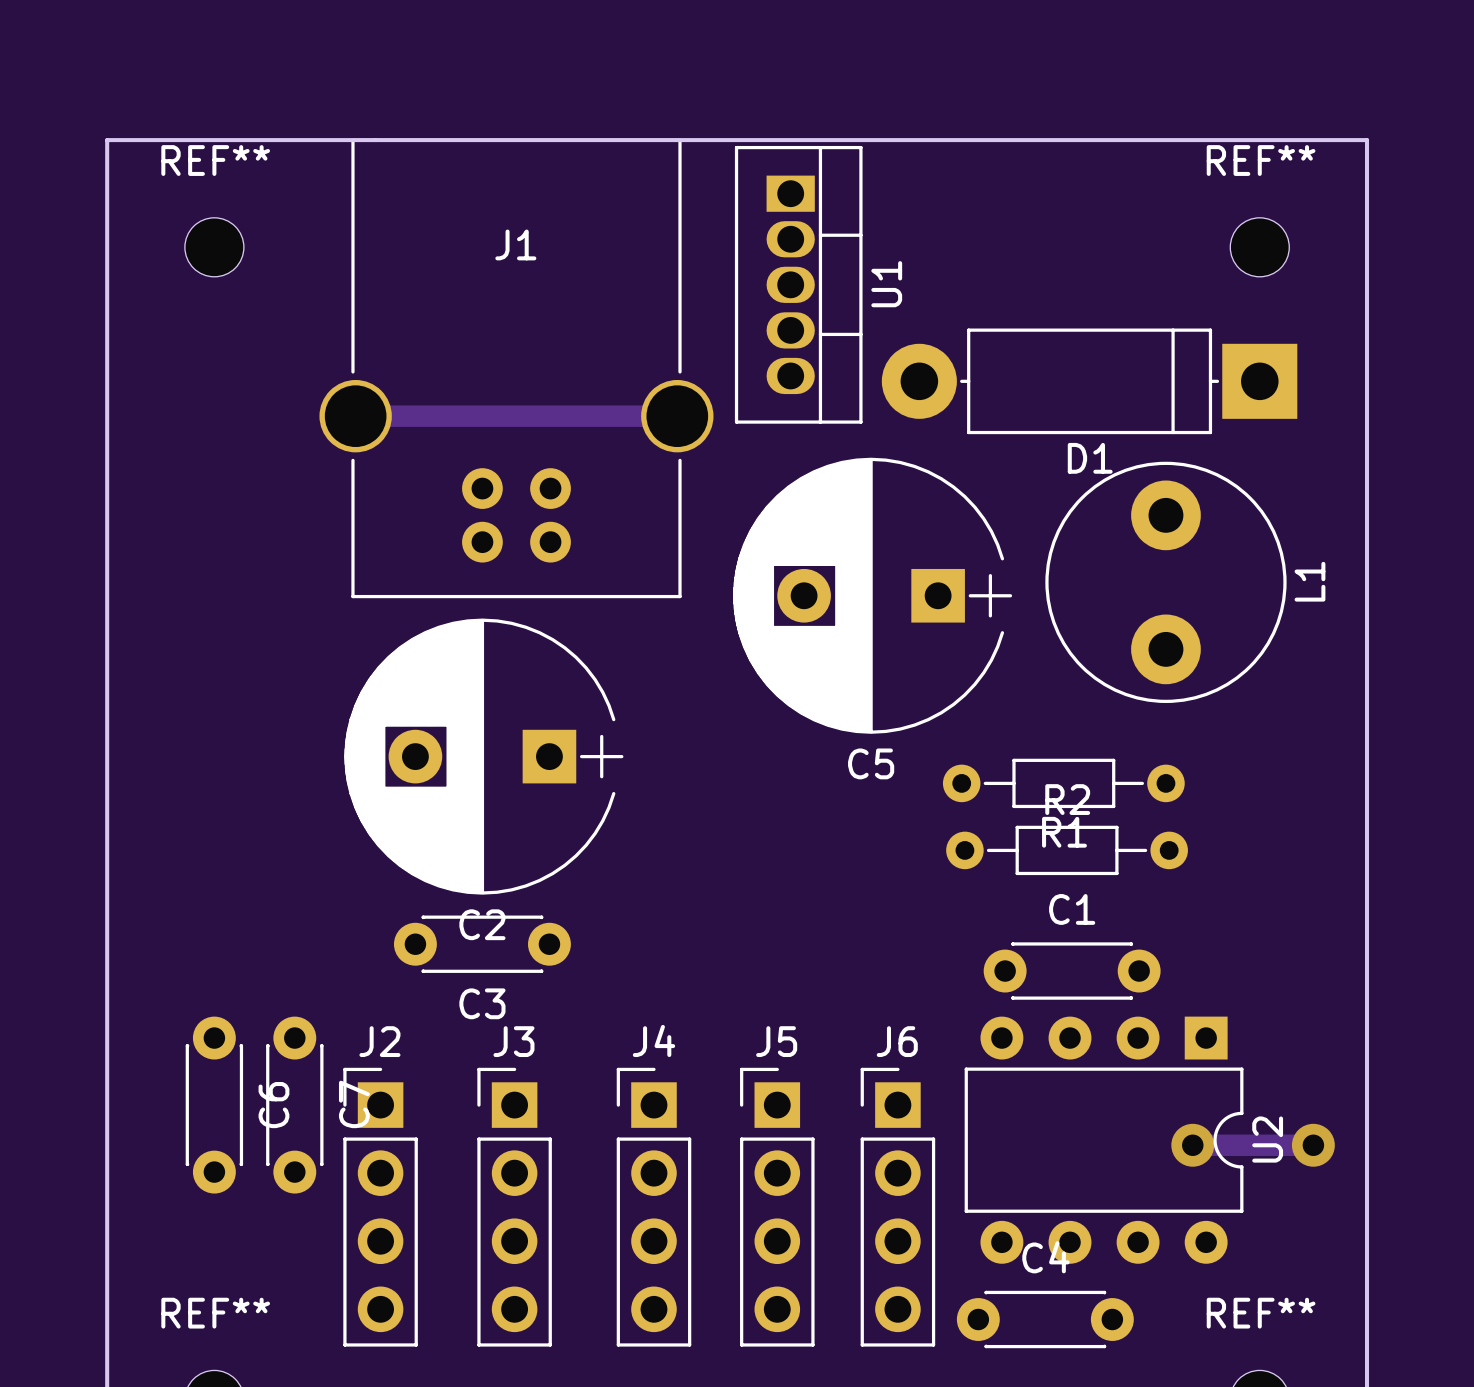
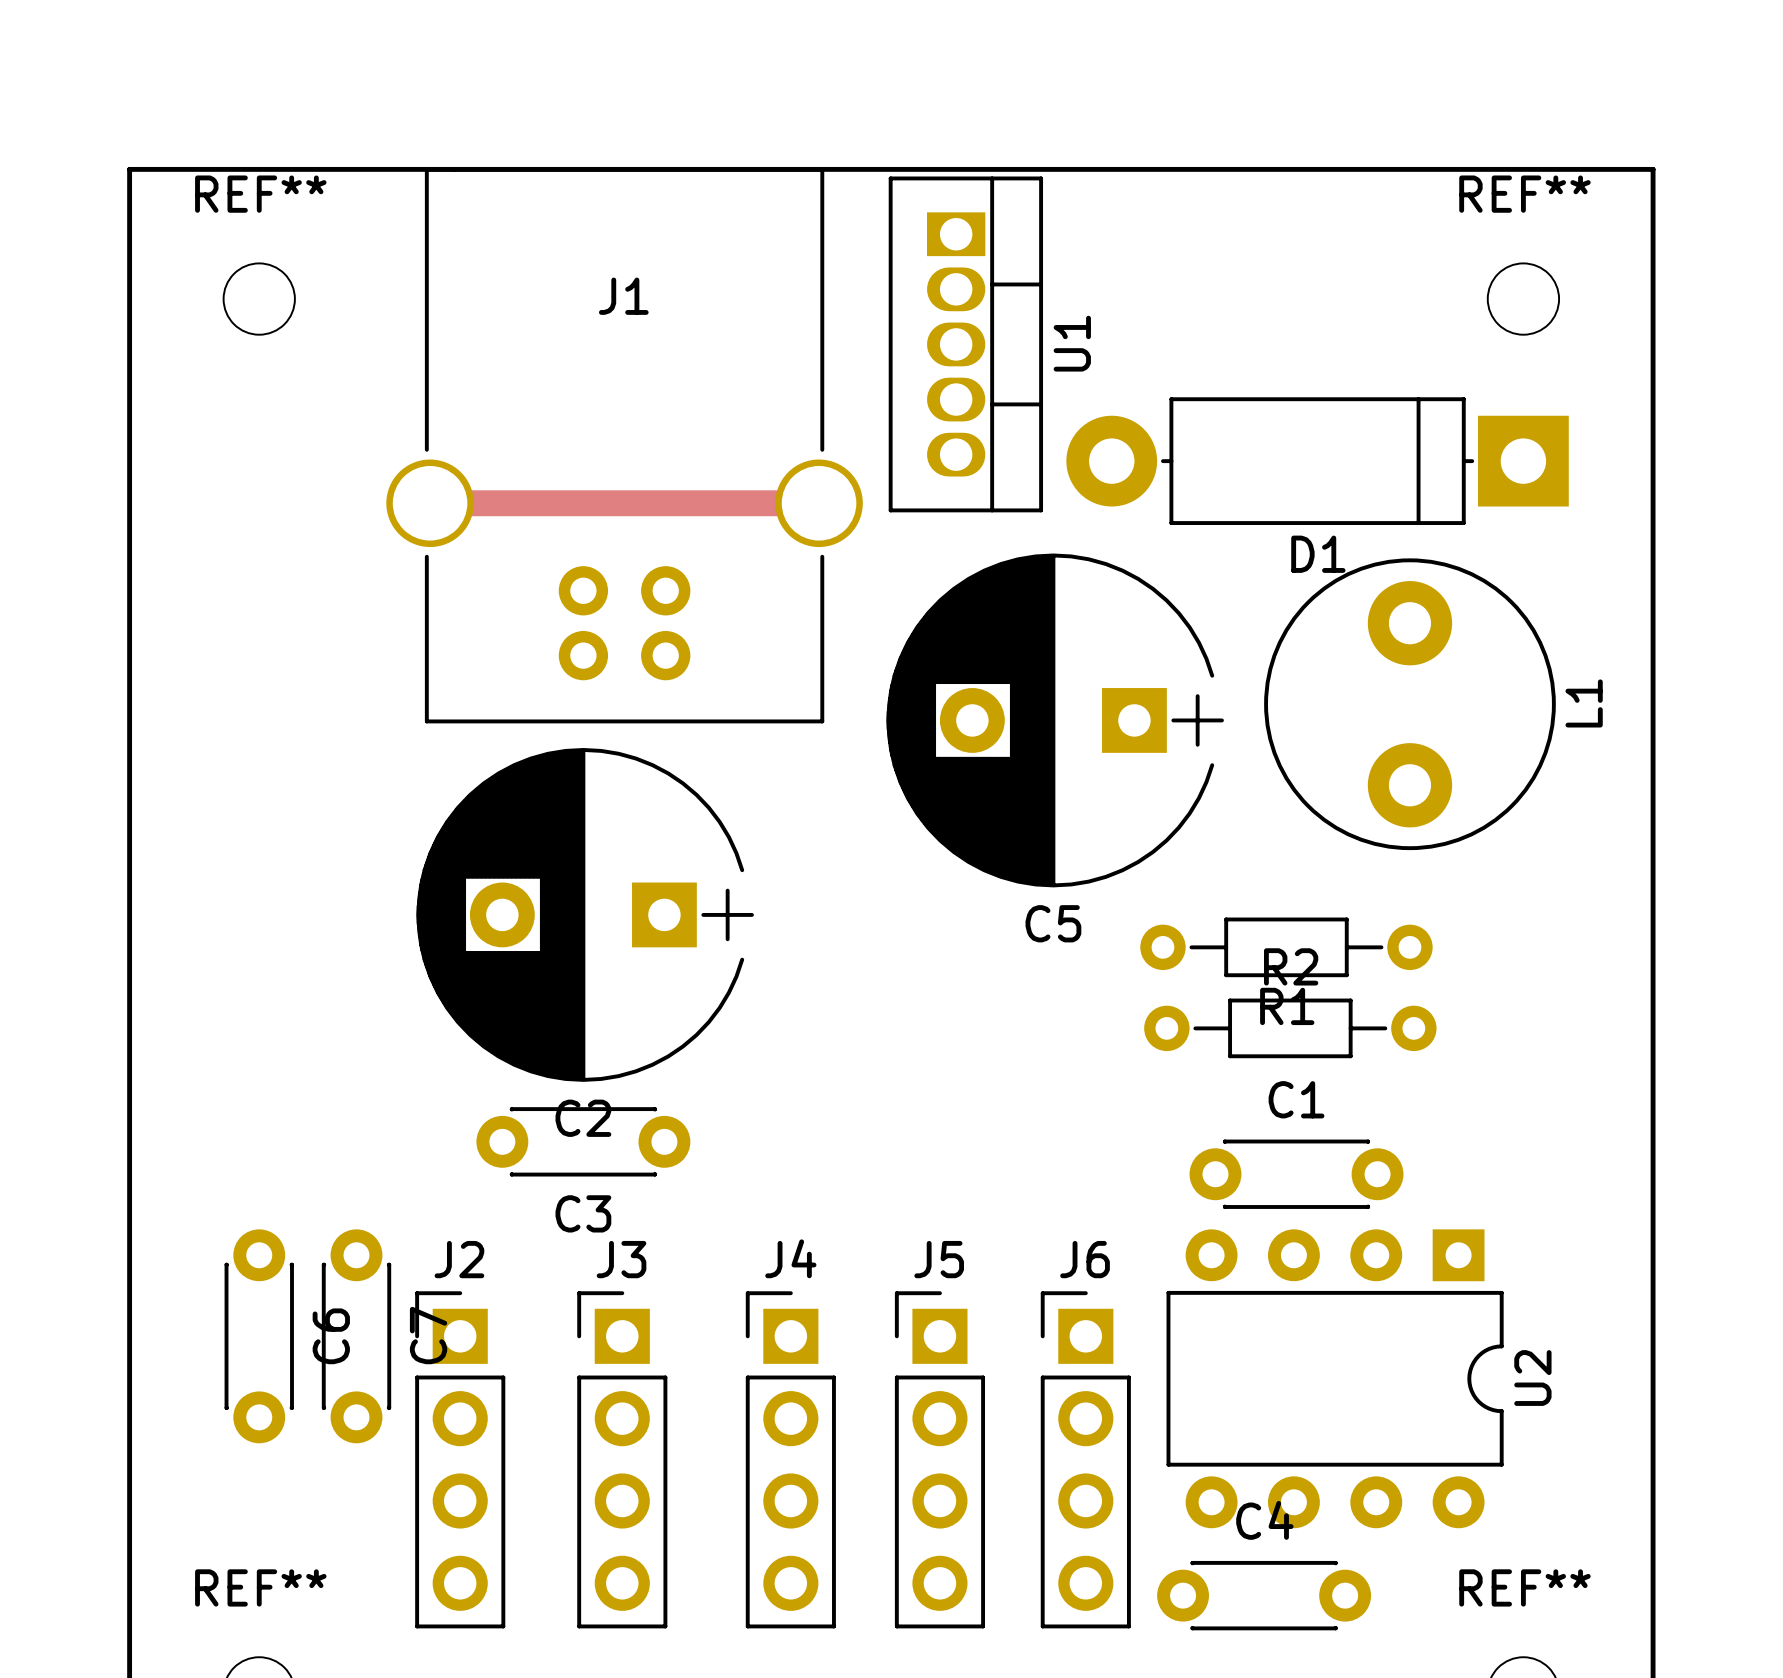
track: (1192, 1145) (1313, 1145) -> none
via: (1192, 1145) -> none
via: (1313, 1145) -> none

